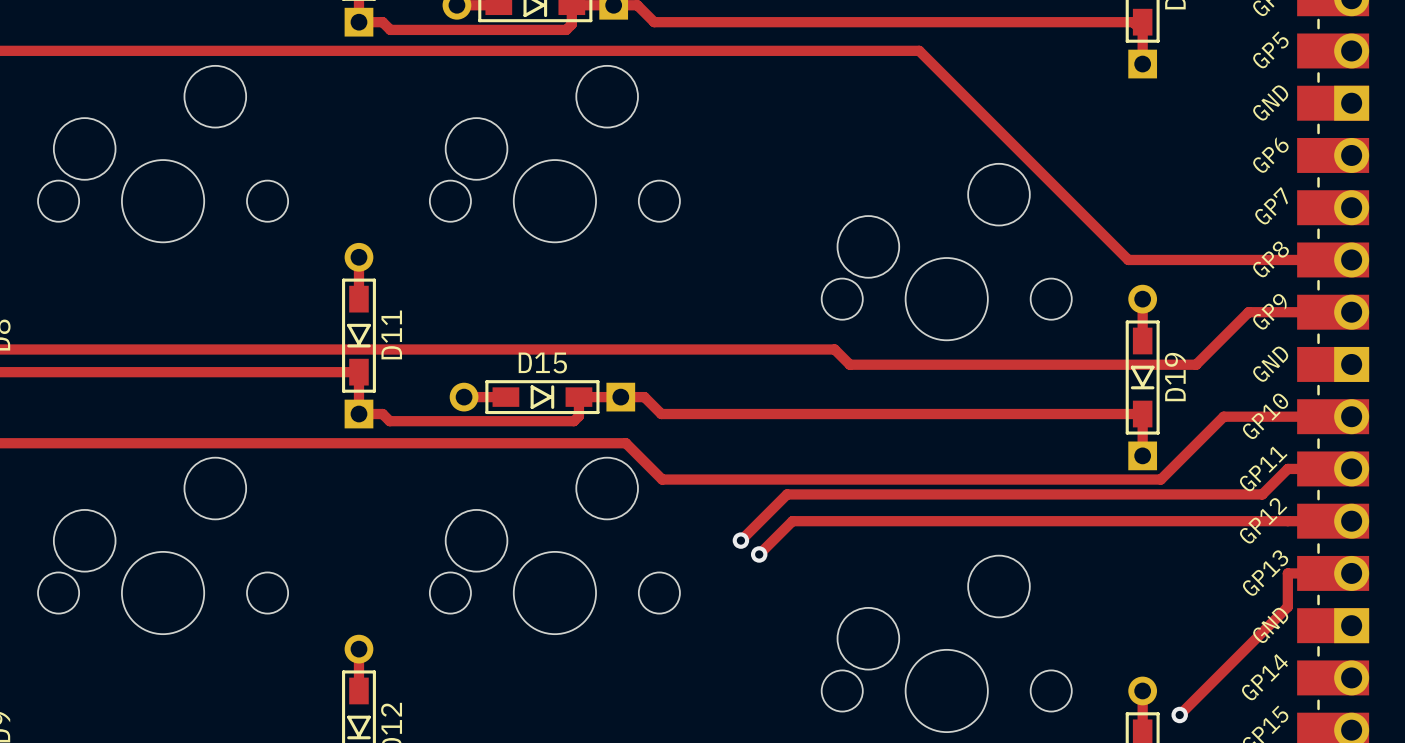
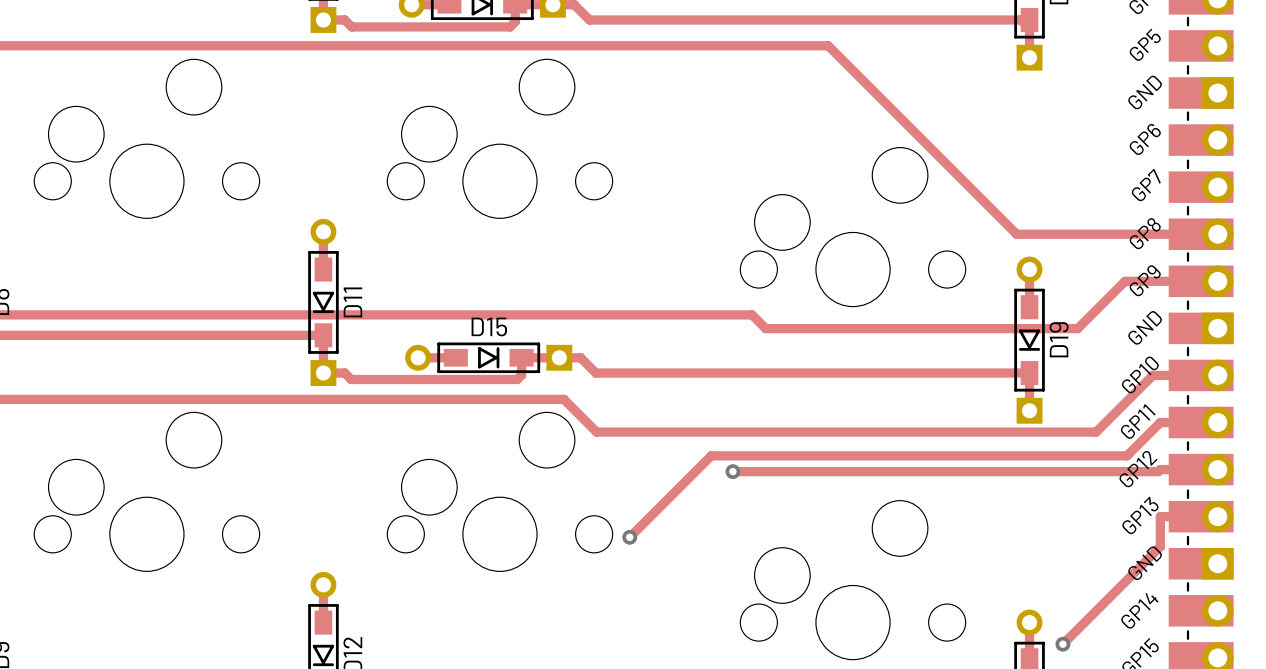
track: (1279, 416) (1223, 416) (1160, 479) -> (1152, 375) (1096, 432) (1045, 432)
track: (1262, 494) (787, 494) (740, 540) -> (1137, 445) (1127, 455) (711, 455) (629, 537)
track: (1287, 521) (792, 521) (759, 554) -> (1160, 469) (1158, 471) (732, 471)
via: none -> (732, 471)
via: (740, 540) -> none
via: (759, 554) -> none
via: none -> (629, 537)

